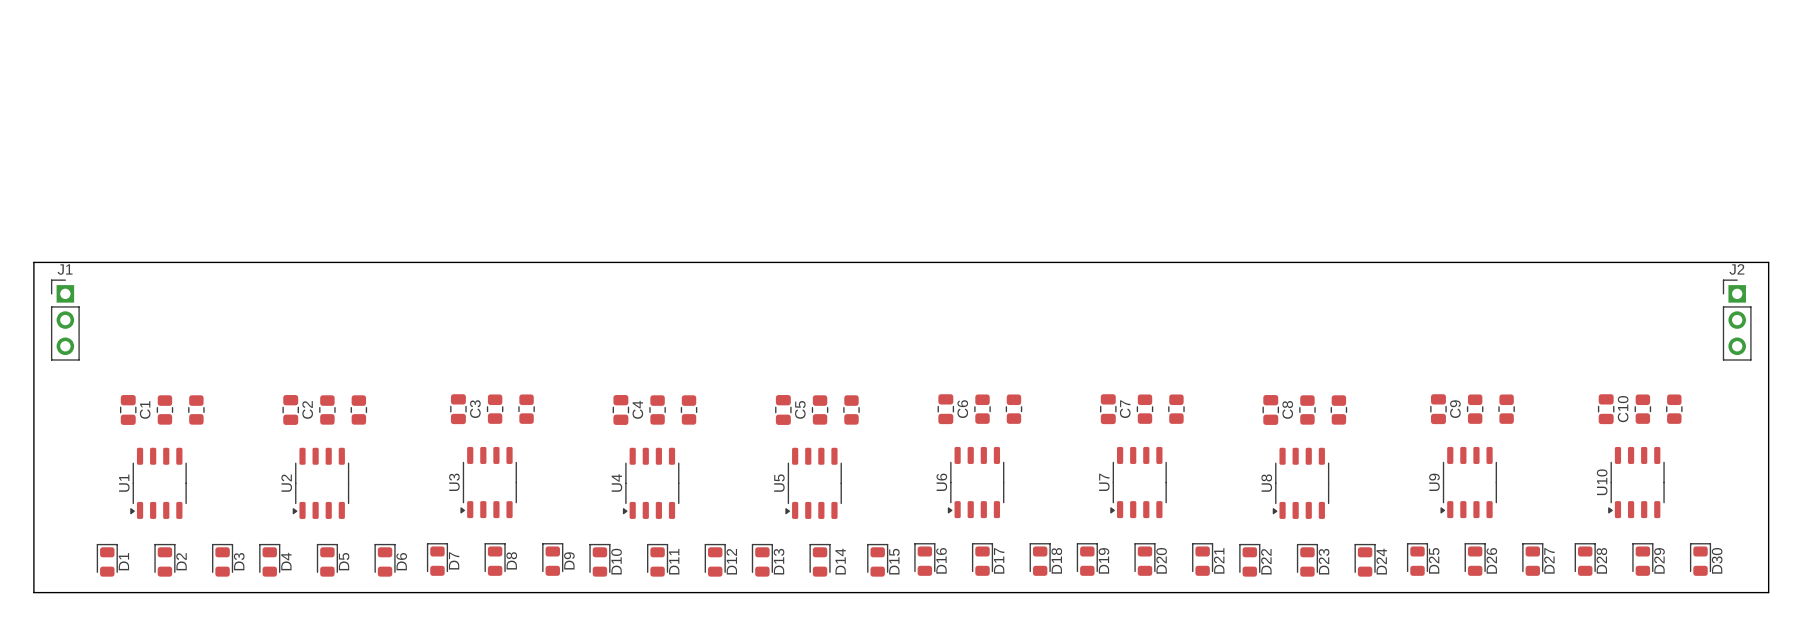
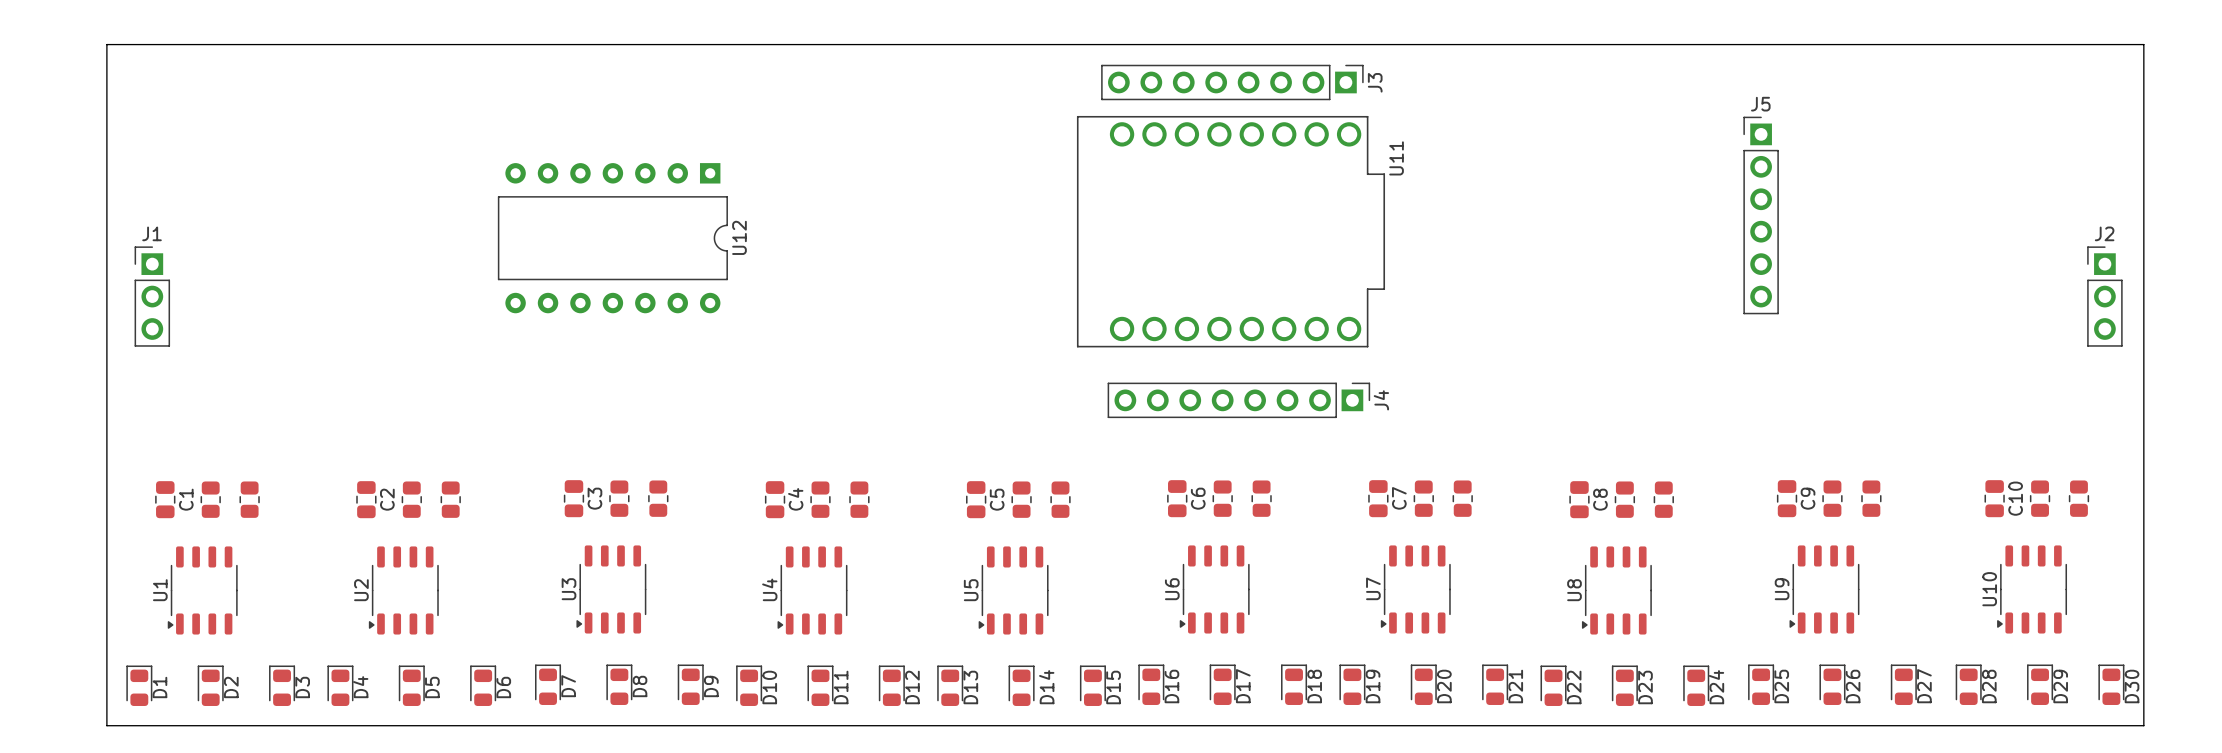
J3: none -> (1232, 82)
J5: none -> (1761, 215)
U11: none -> (1230, 231)
U12: none -> (612, 238)
J1 position: (65, 320) -> (152, 296)
J2 position: (1737, 320) -> (2104, 296)
J4: none -> (1238, 400)
board edge: (81, 592) (33, 592) (33, 262) (1768, 262) (1768, 592) (1726, 592) -> (106, 725) (106, 44) (2143, 44) (2143, 725)

